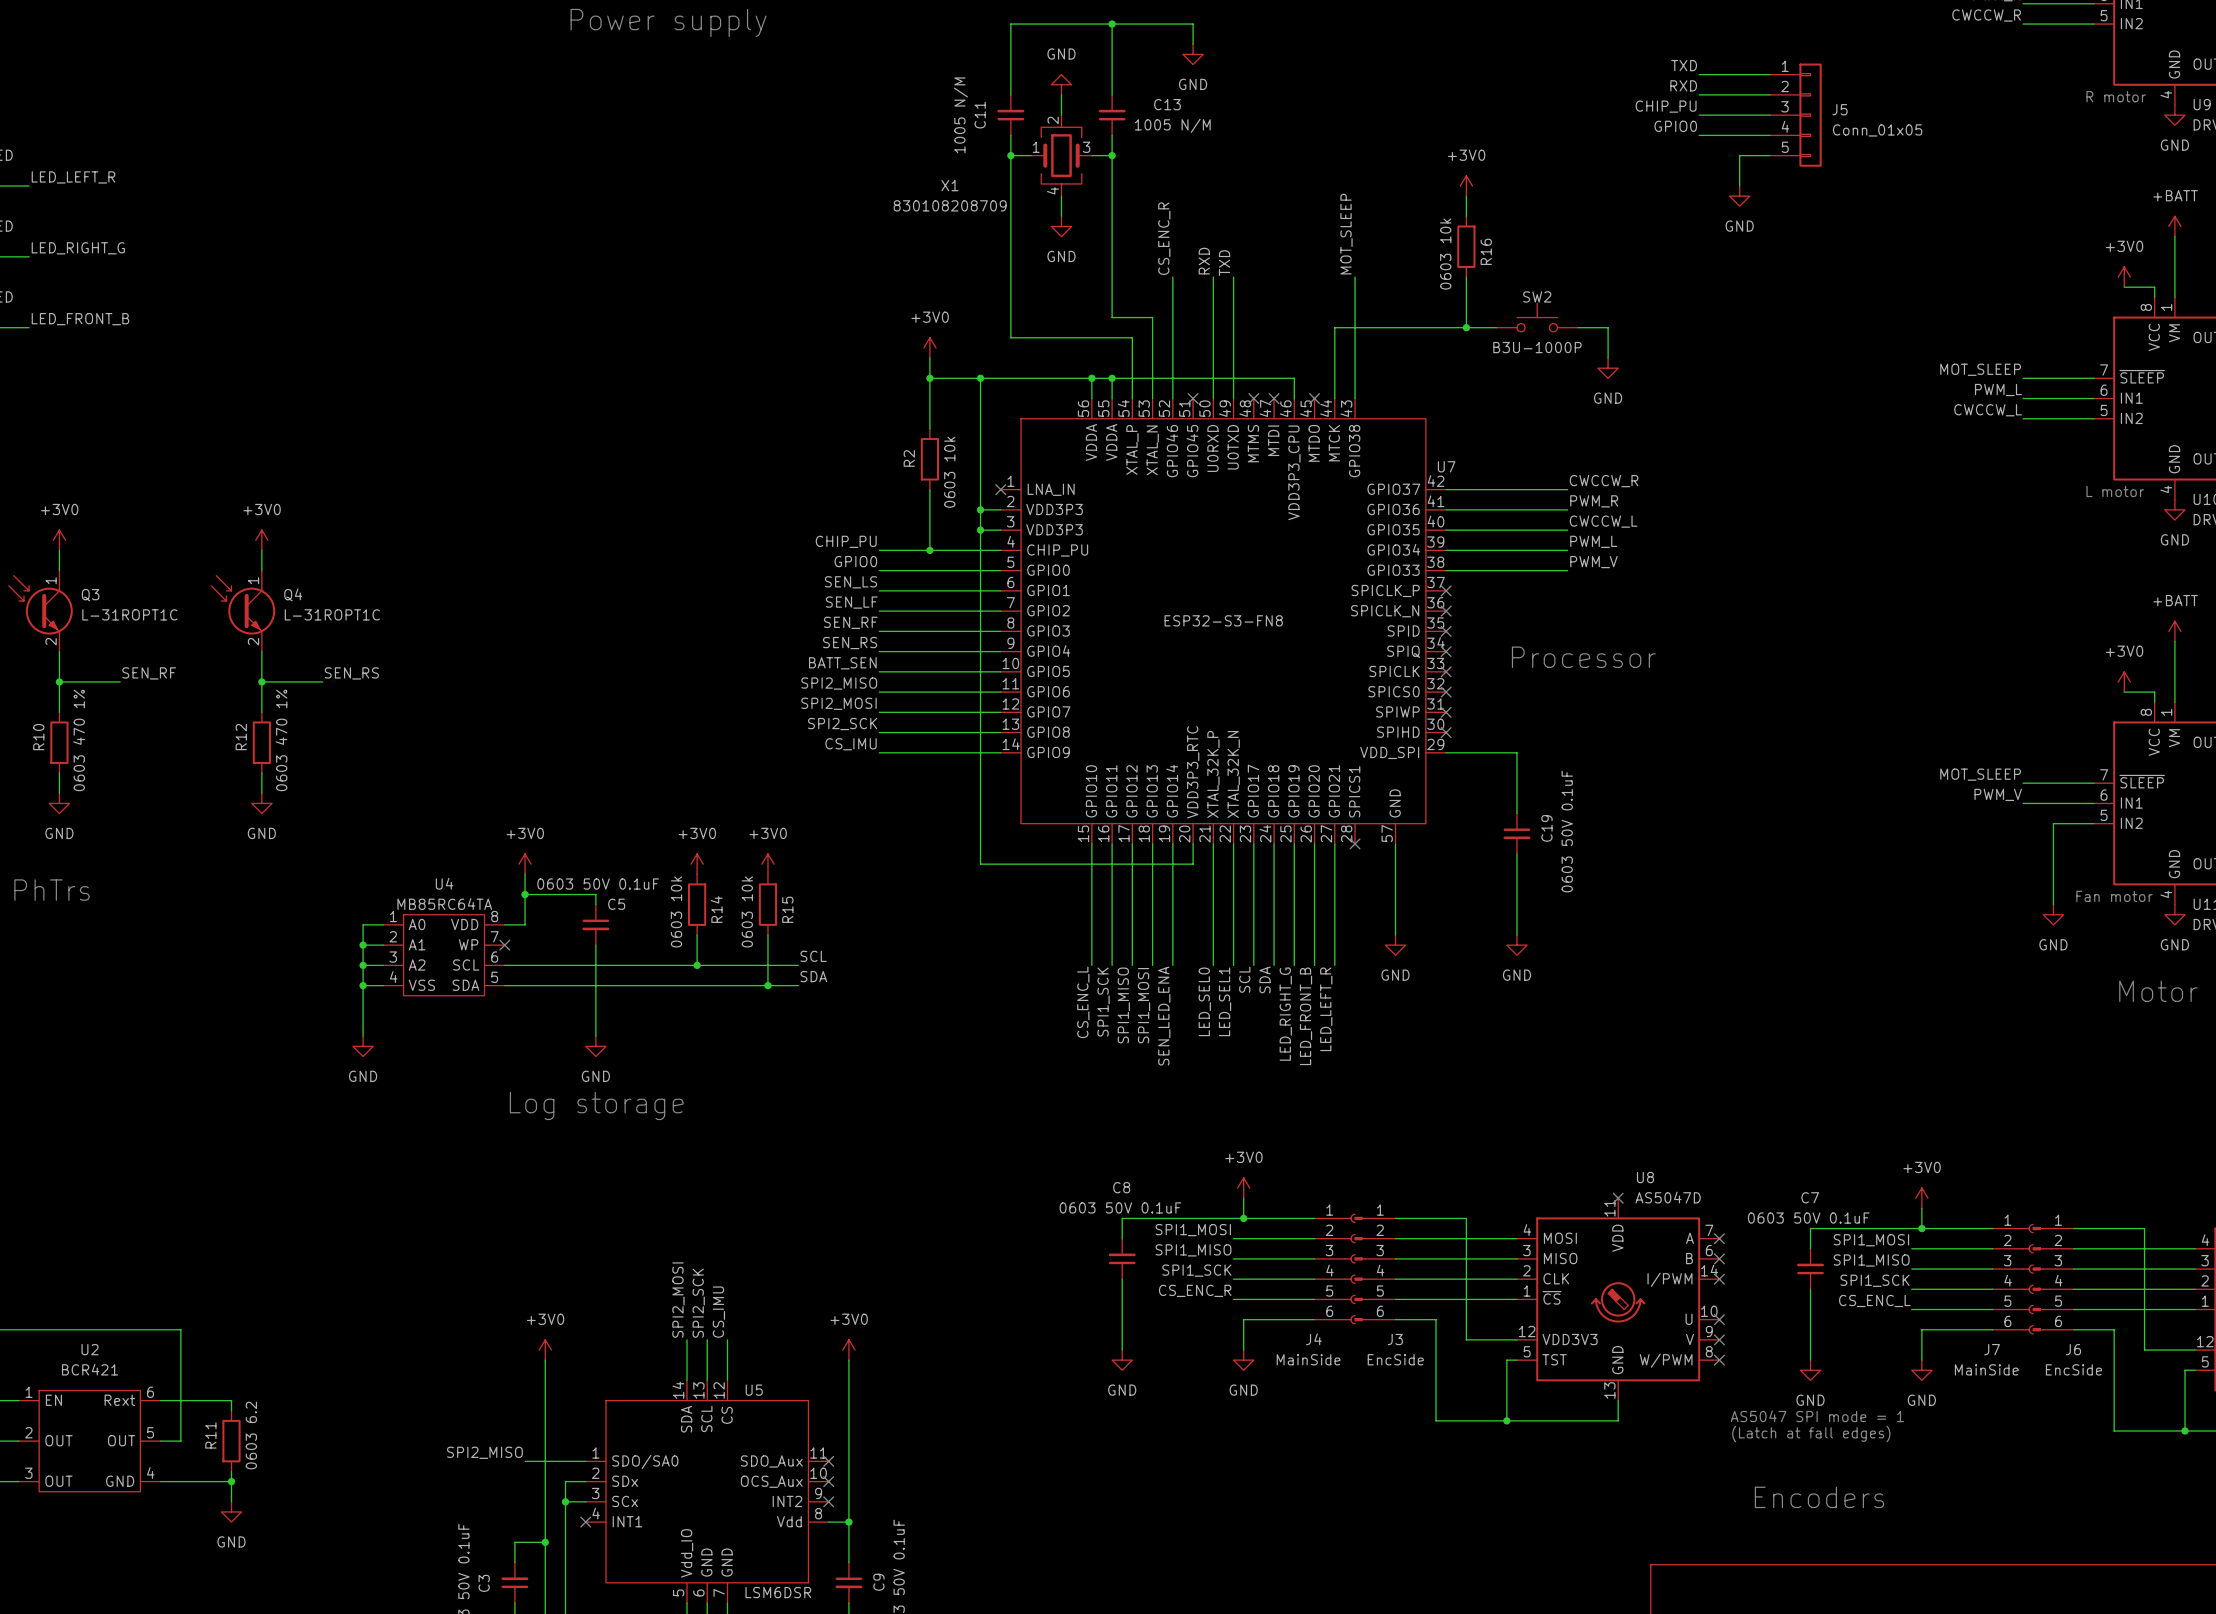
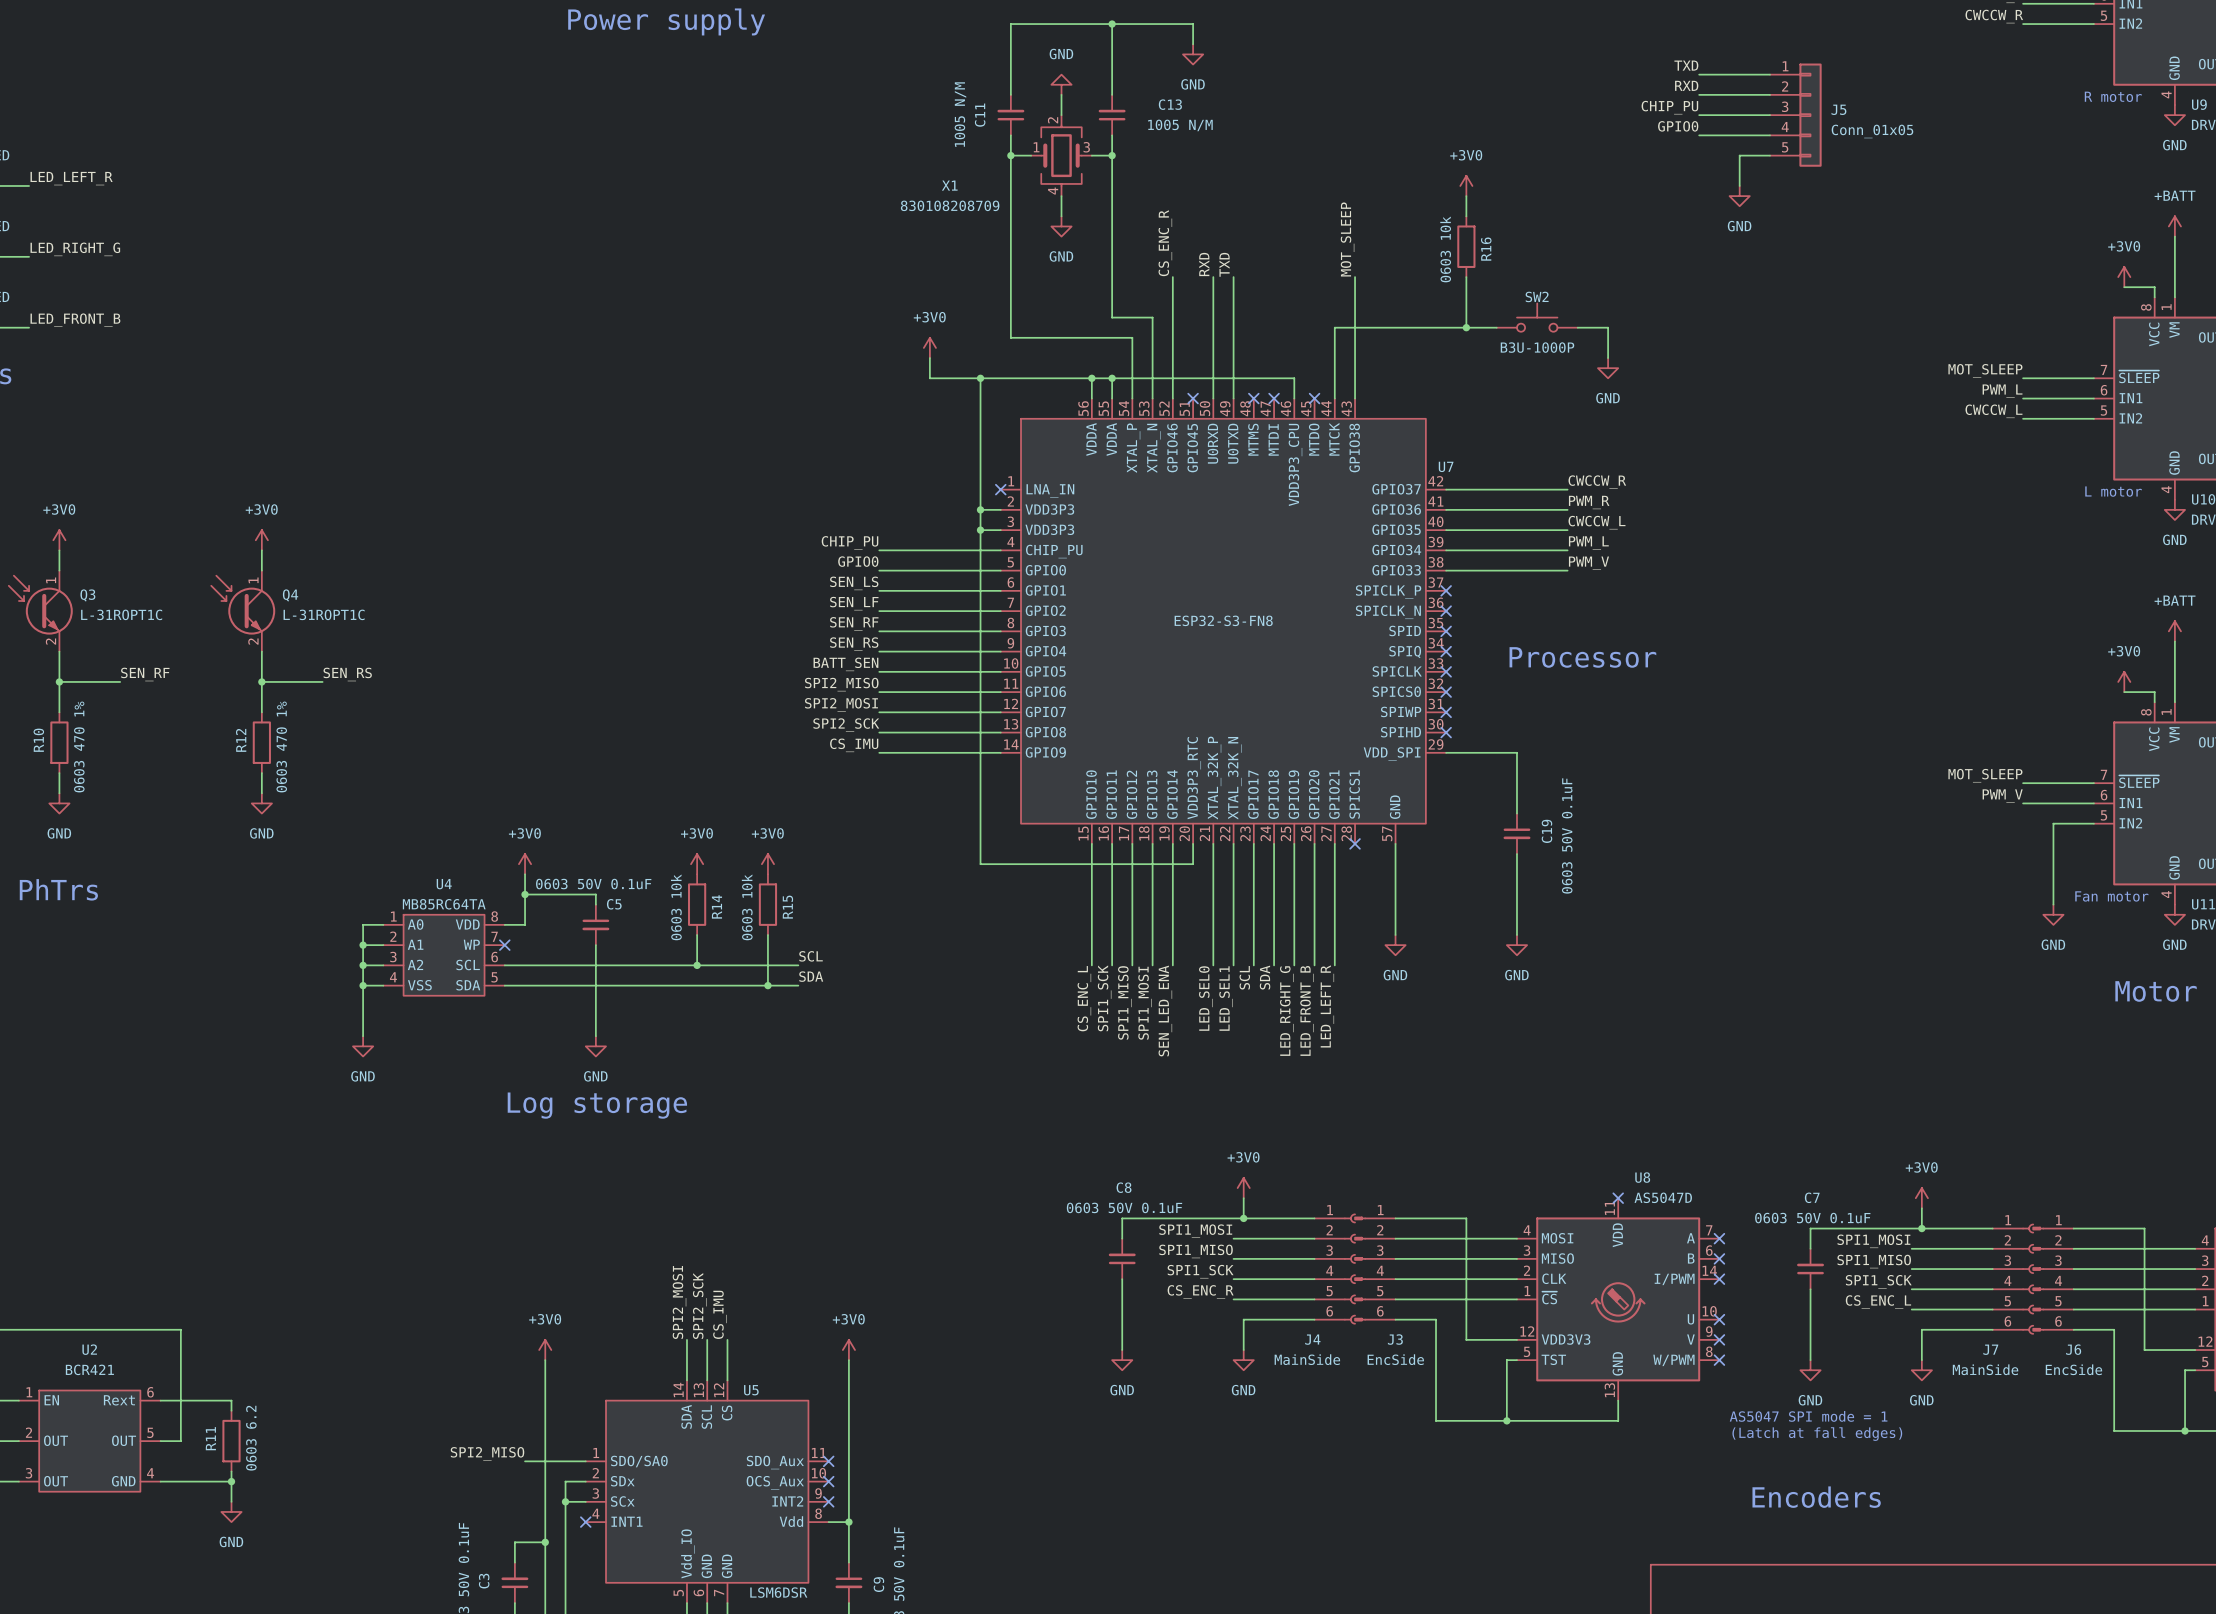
wire: (929, 378) (929, 428) -> none
junction: (929, 378) -> none
R2: 0603 10k (929, 459) -> none
wire: (929, 489) (929, 550) -> none
junction: (929, 550) -> none

